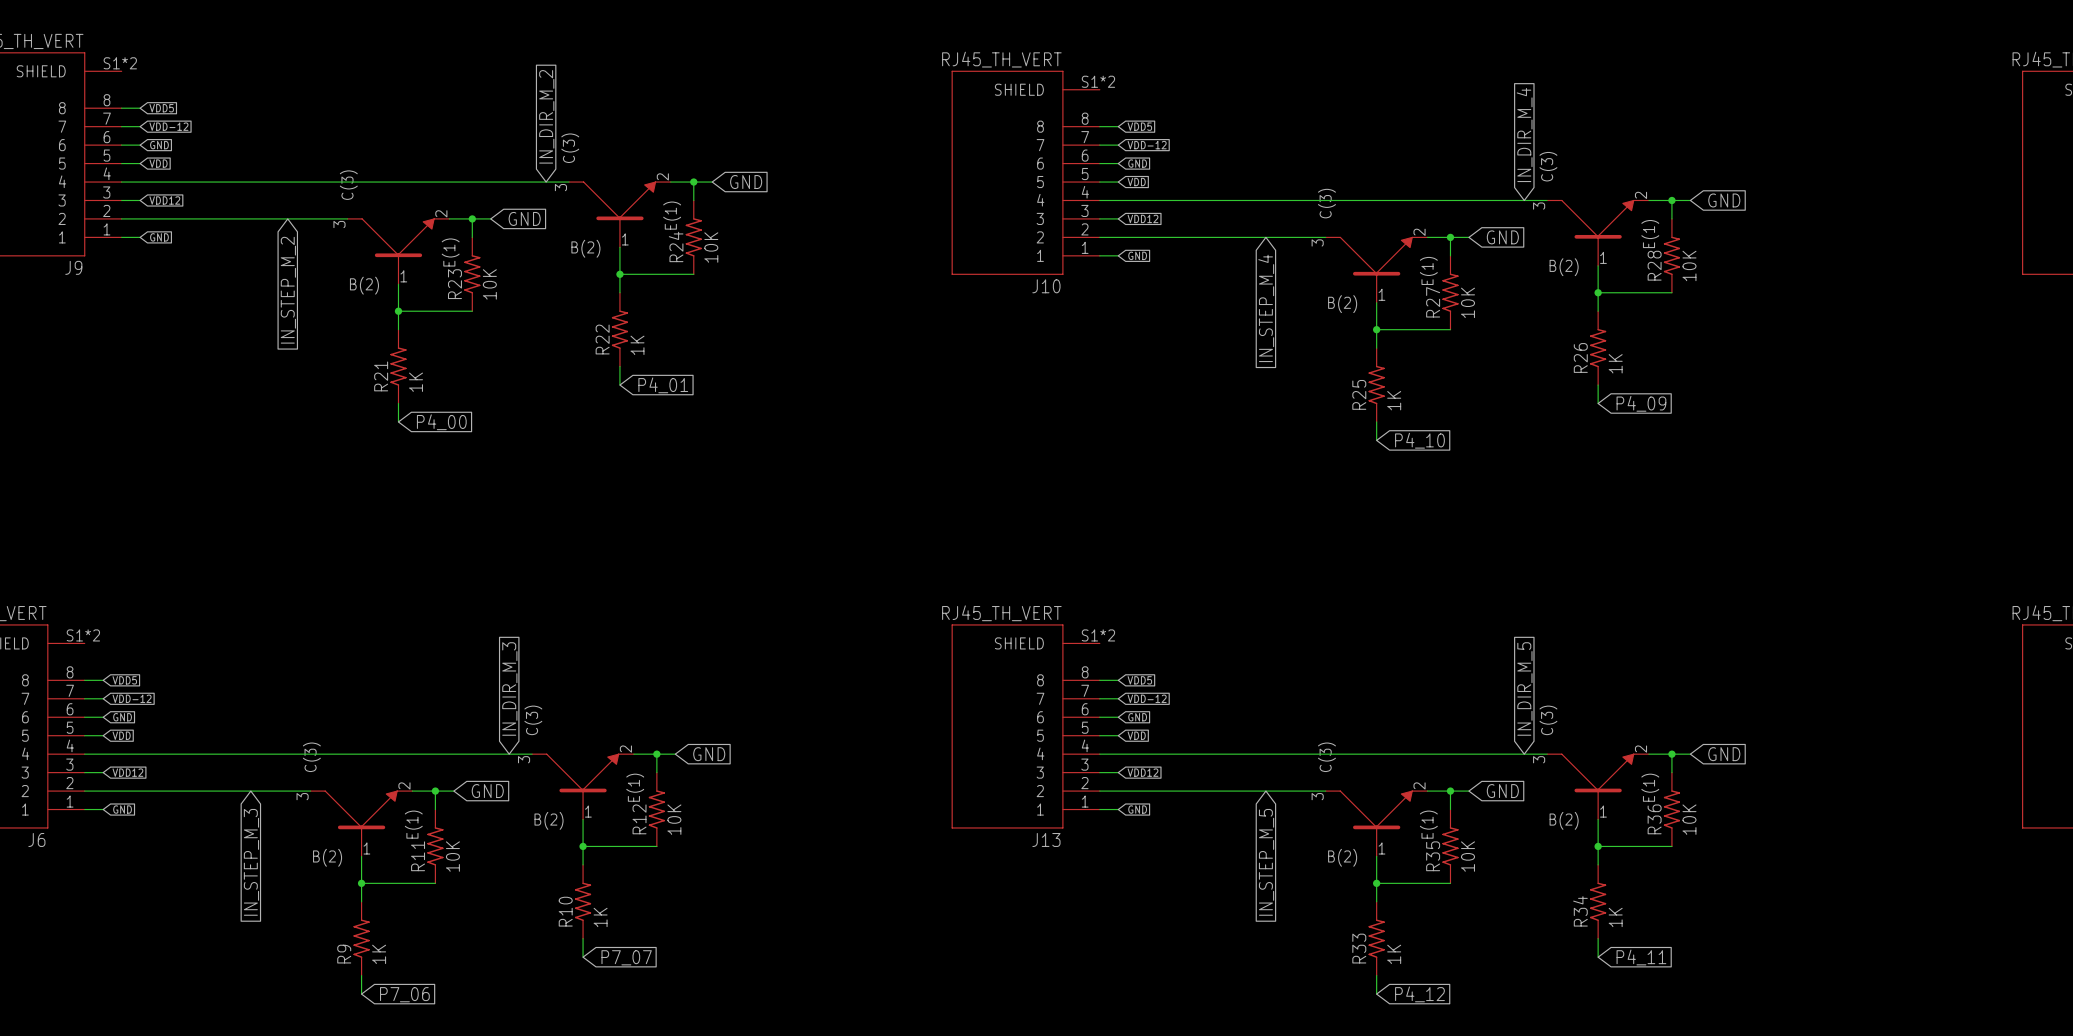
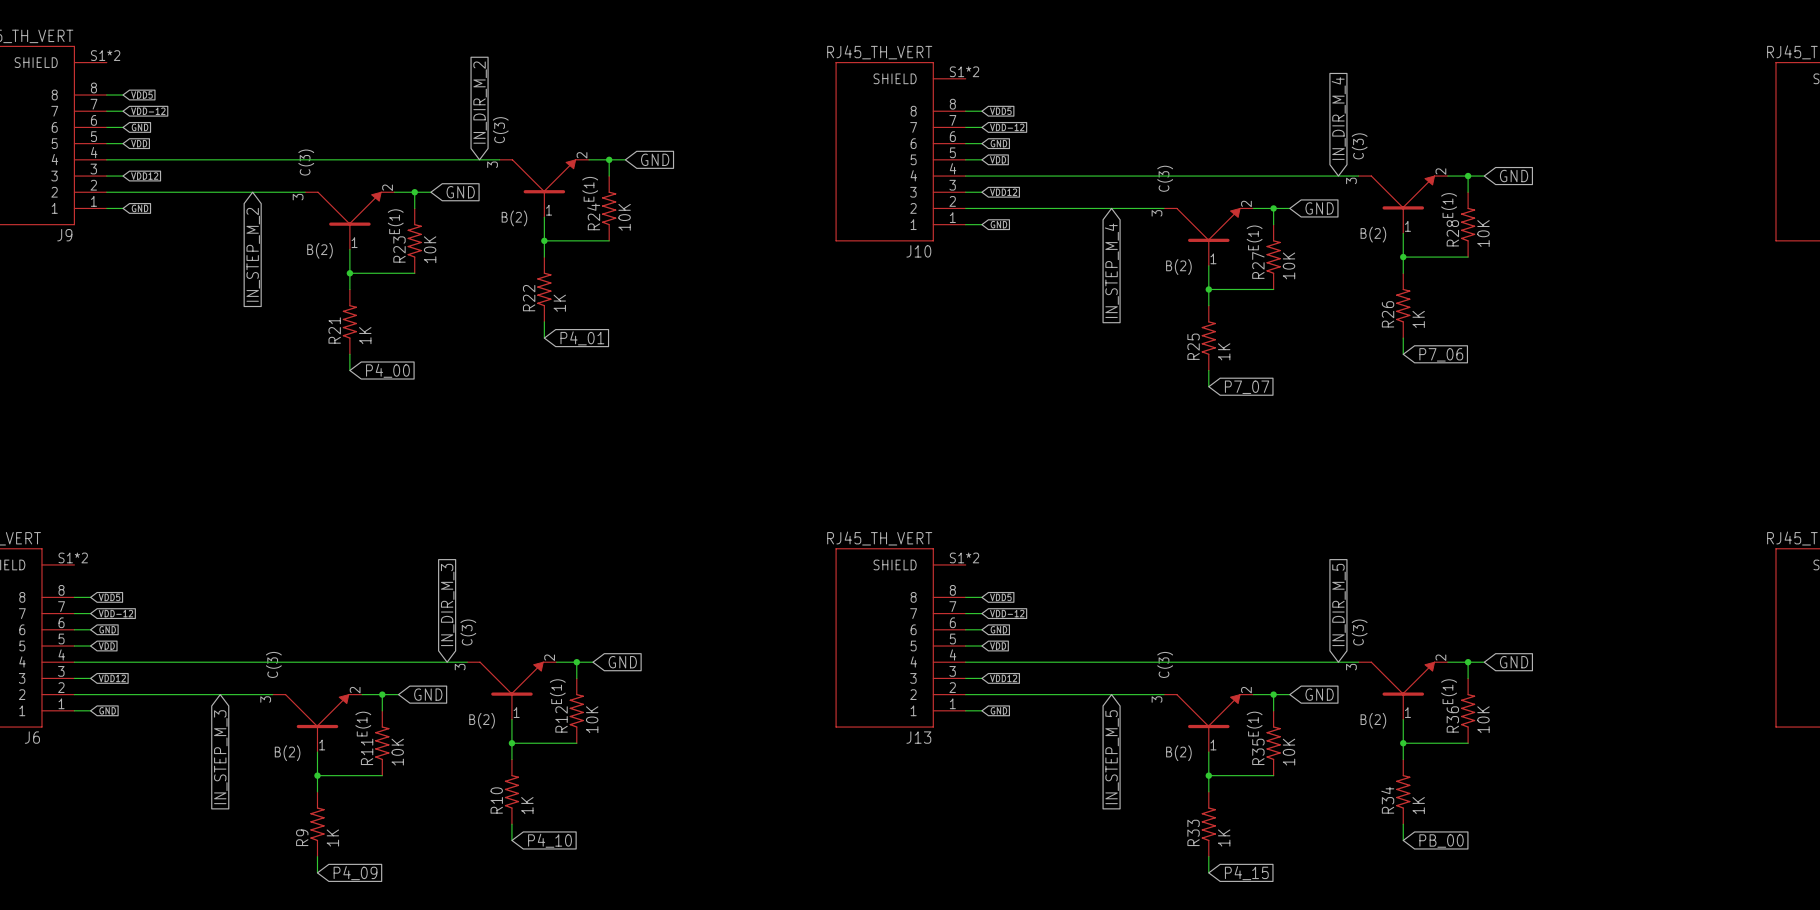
global label: P4_09 (1641, 403) -> P7_06 (1441, 354)
global label: P4_10 (1419, 440) -> P7_07 (1247, 387)
global label: P7_07 (626, 957) -> P4_10 (549, 840)
global label: P4_11 (1641, 957) -> PB_00 (1441, 841)
global label: P7_06 (404, 994) -> P4_09 (355, 873)
global label: P4_12 (1419, 994) -> P4_15 (1246, 873)

